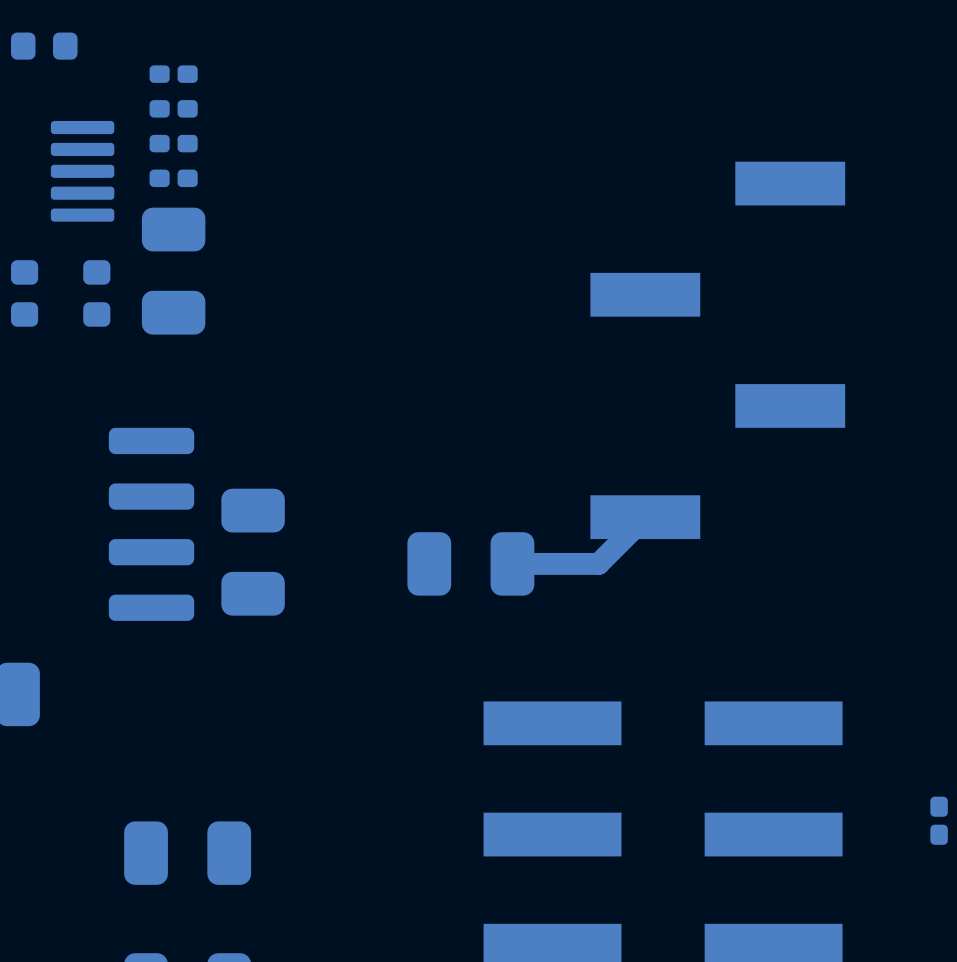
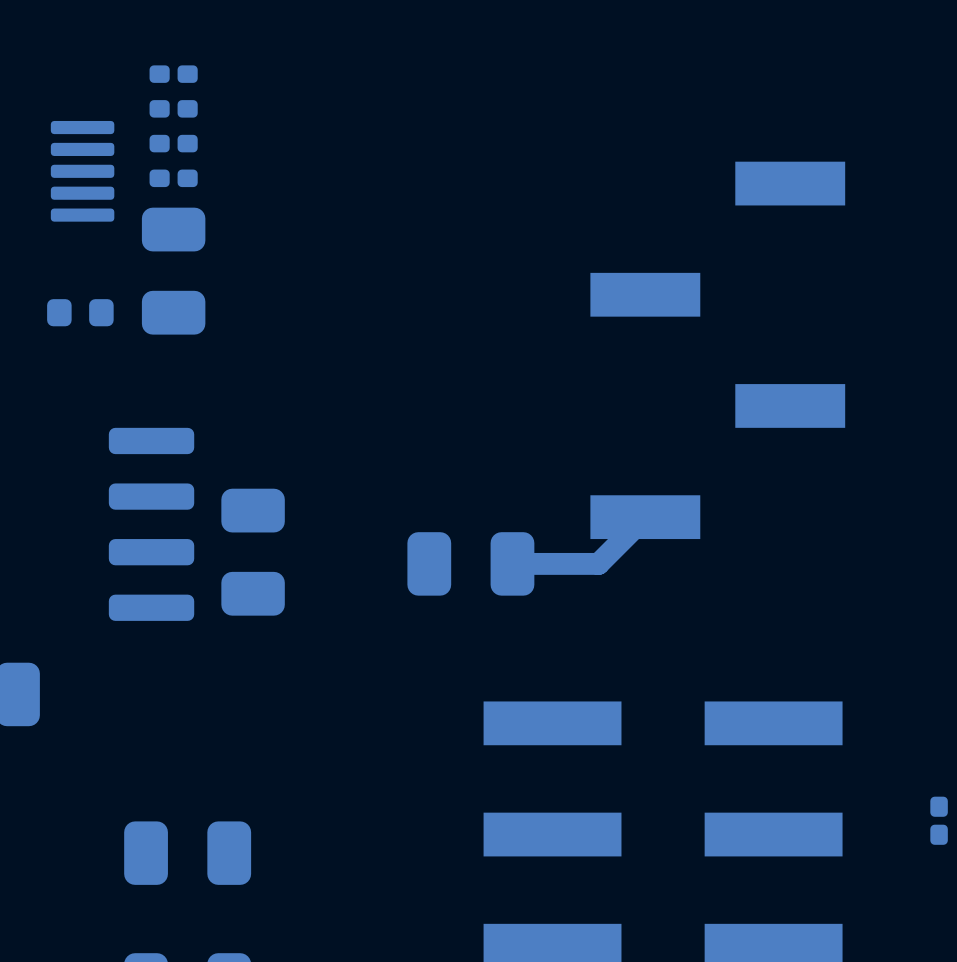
part: (44, 46) -> none
part: (24, 293) -> none
part rotation: 0° (96, 293) -> 90° clockwise (80, 312)

